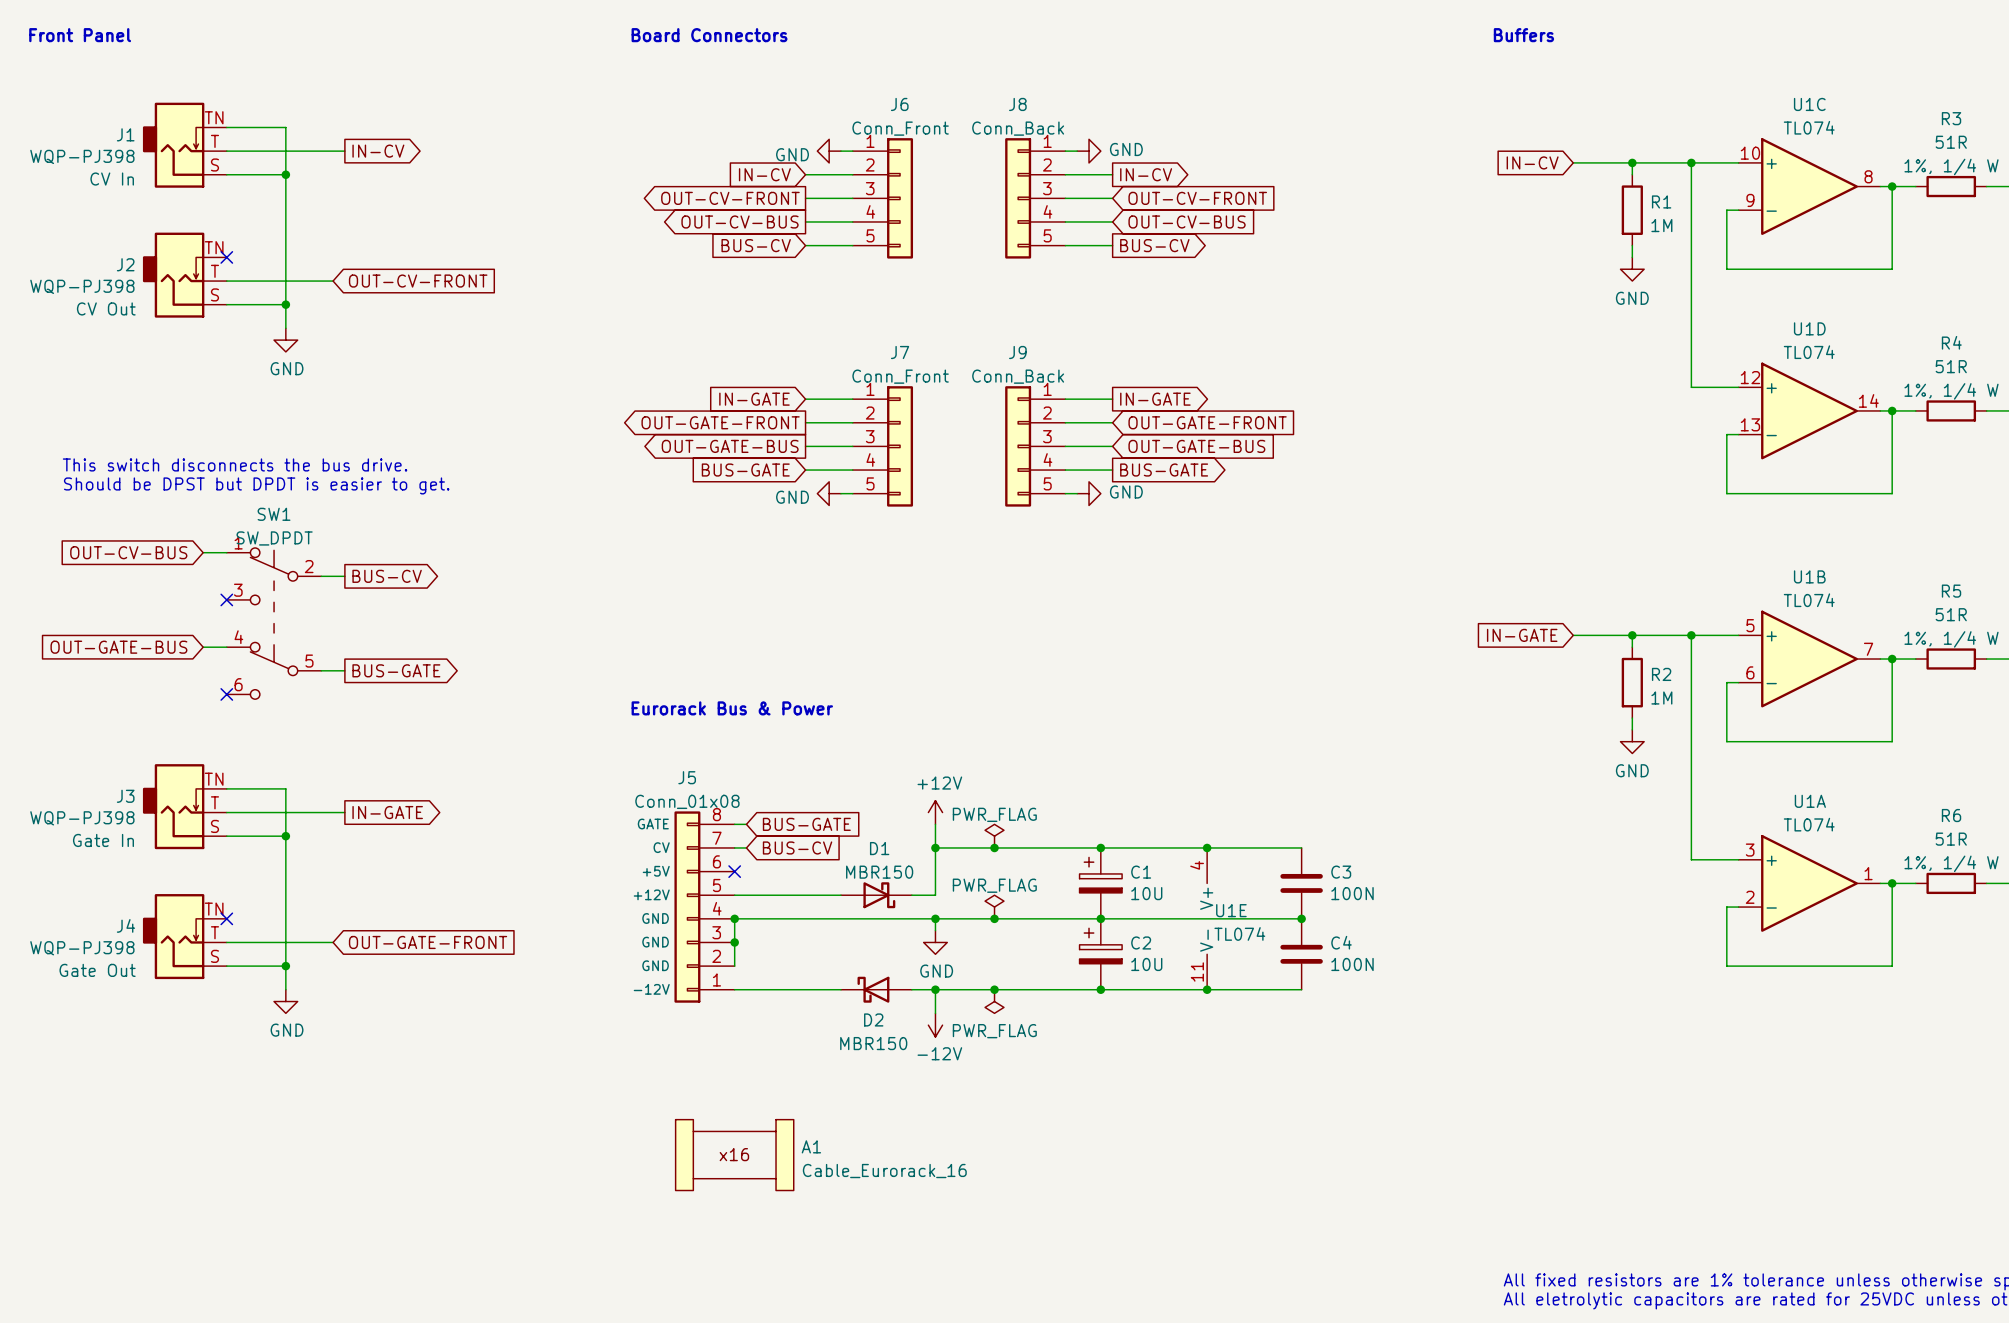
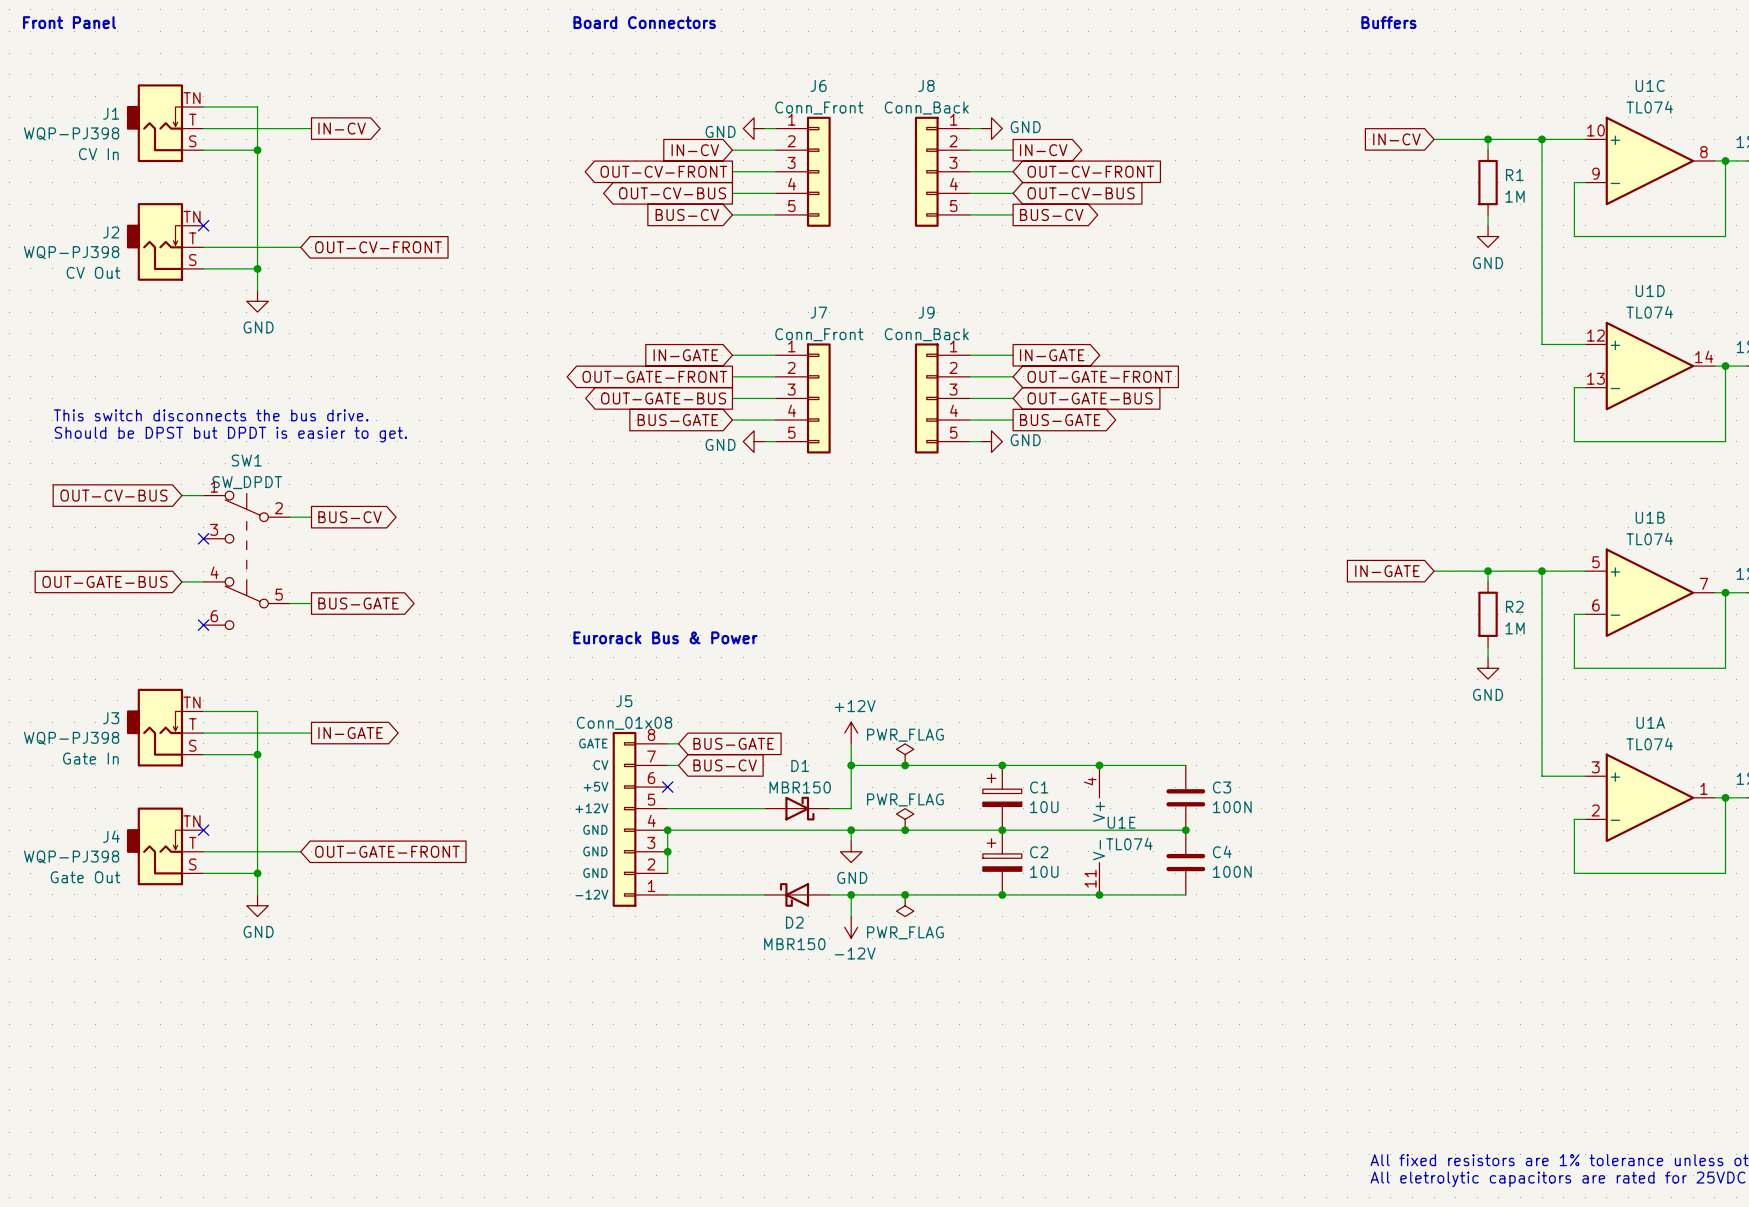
A1: Cable_Eurorack_16 (734, 1155) -> none

